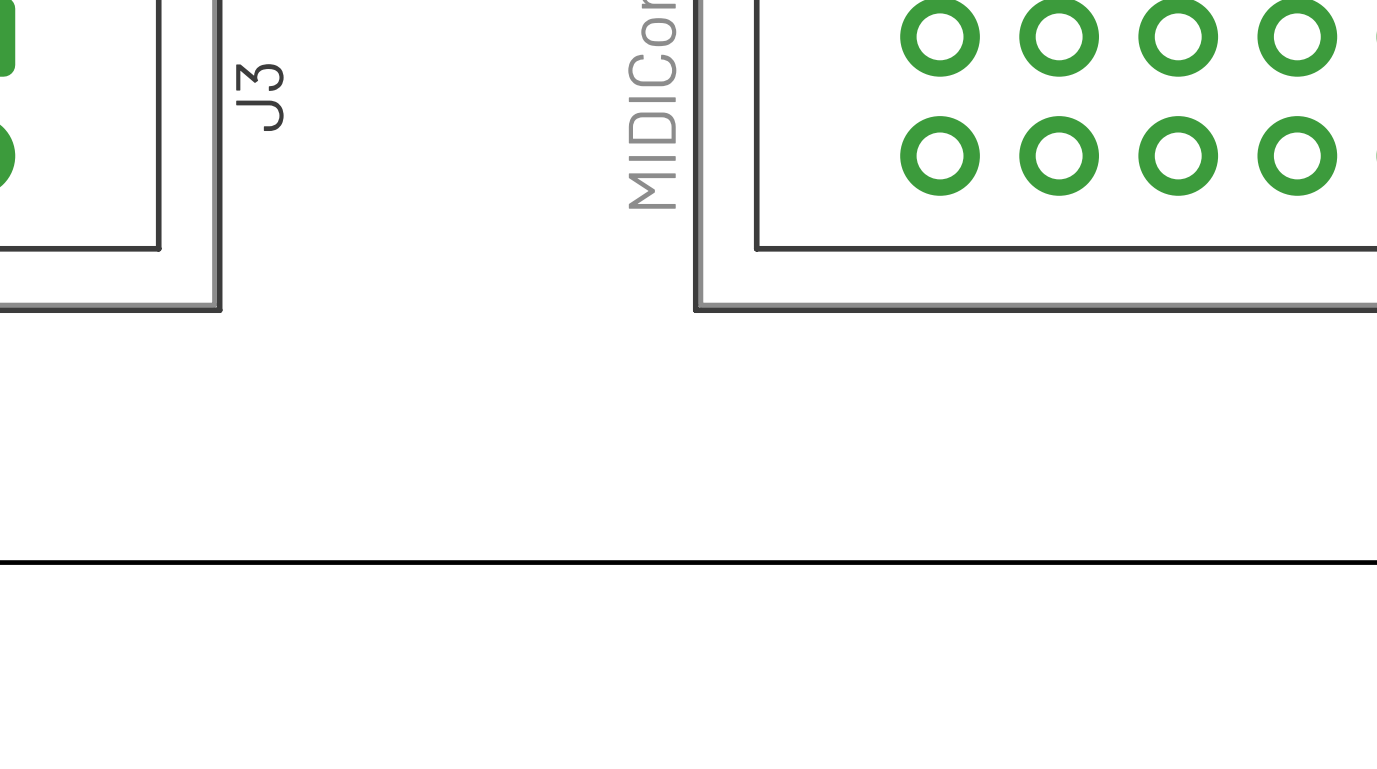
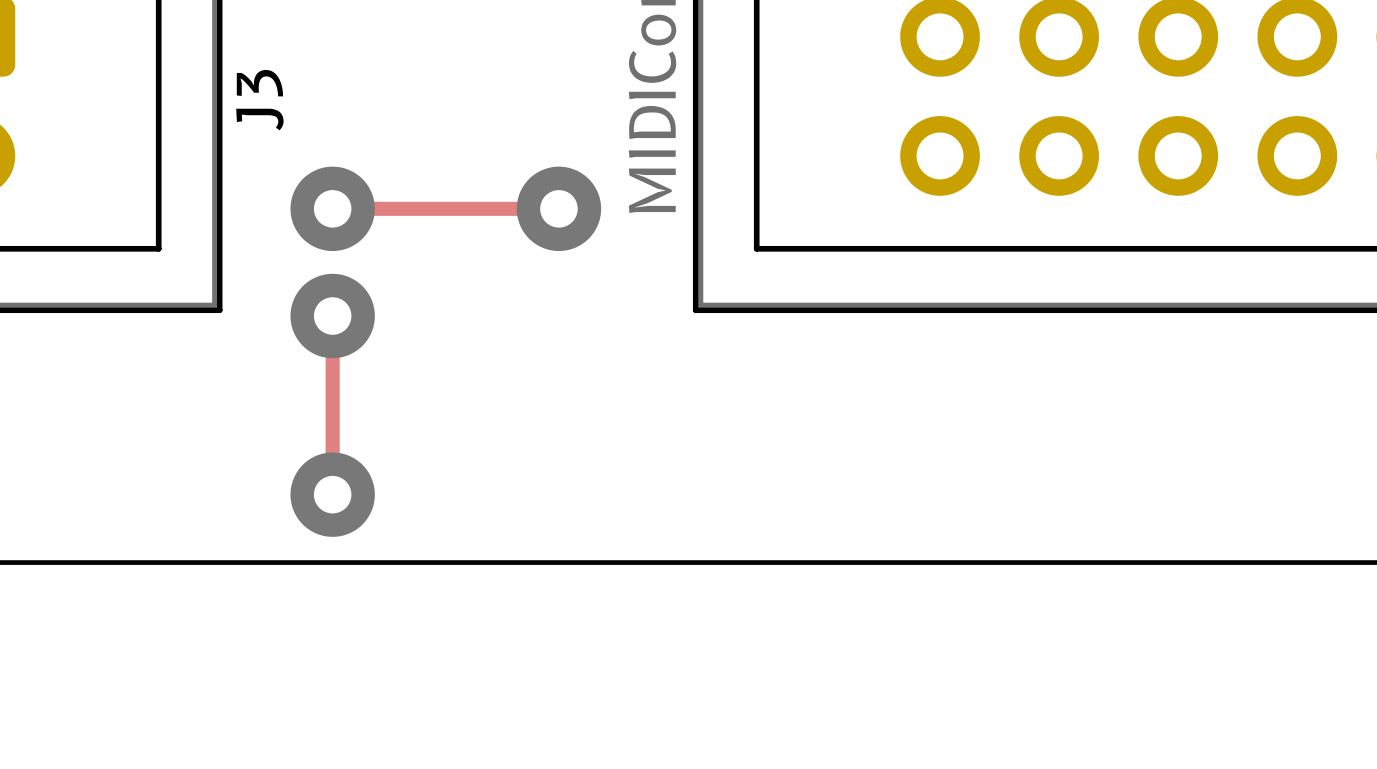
track: none -> (332, 208) (558, 208)
via: none -> (332, 208)
via: none -> (558, 208)
track: none -> (332, 316) (332, 494)
via: none -> (332, 316)
via: none -> (332, 494)

